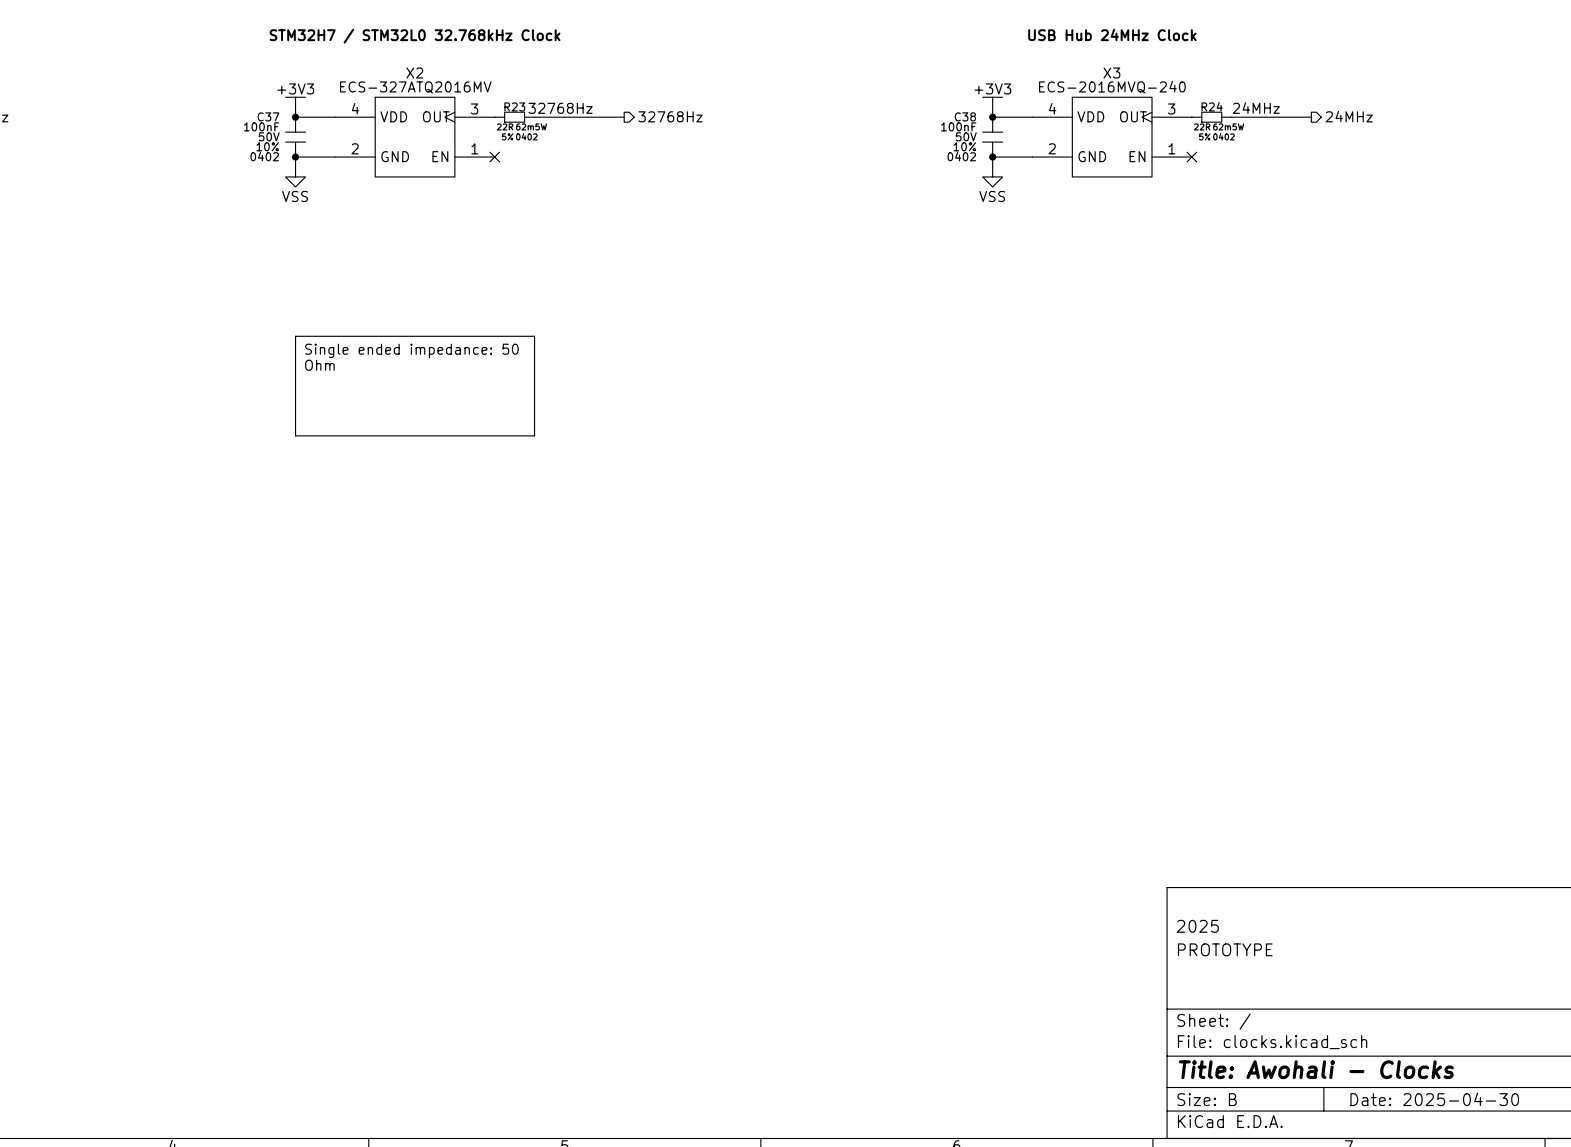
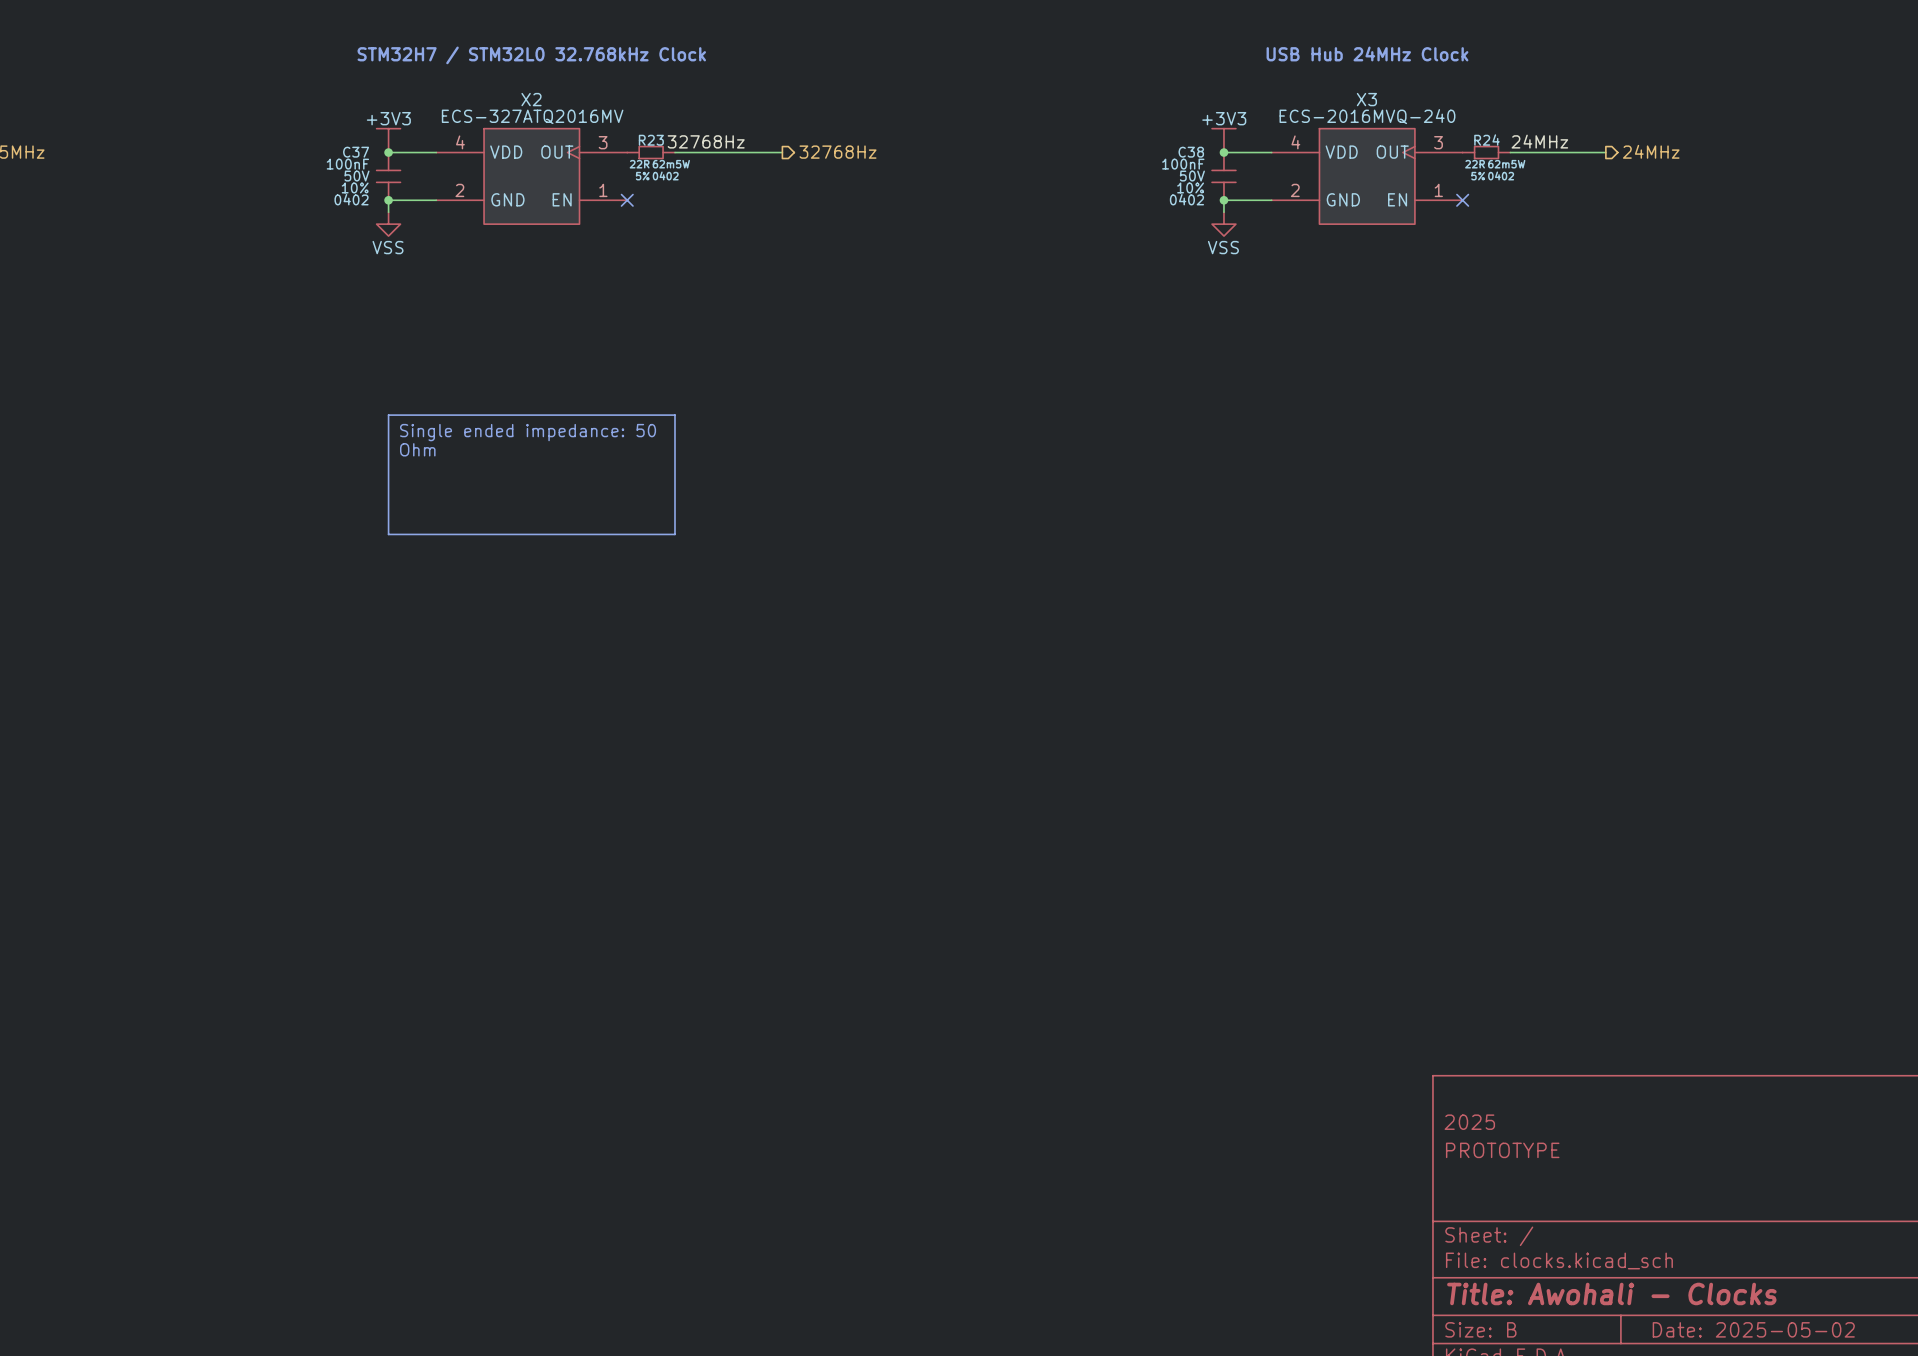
title block: Date: 2025-04-30 (1434, 1099) -> Date: 2025-05-02 (1753, 1329)

